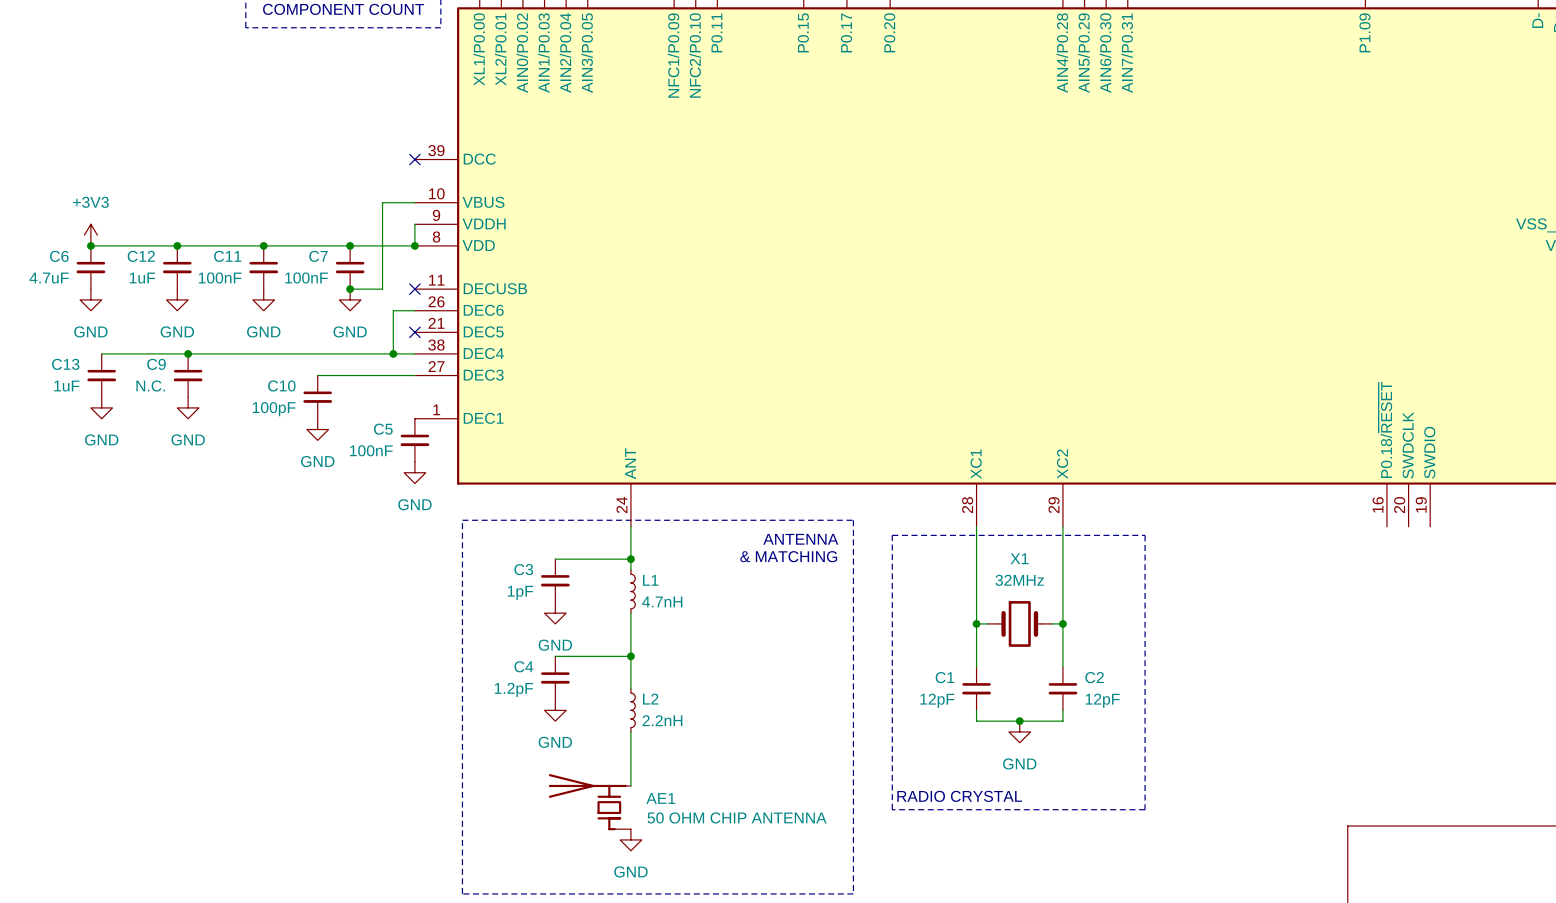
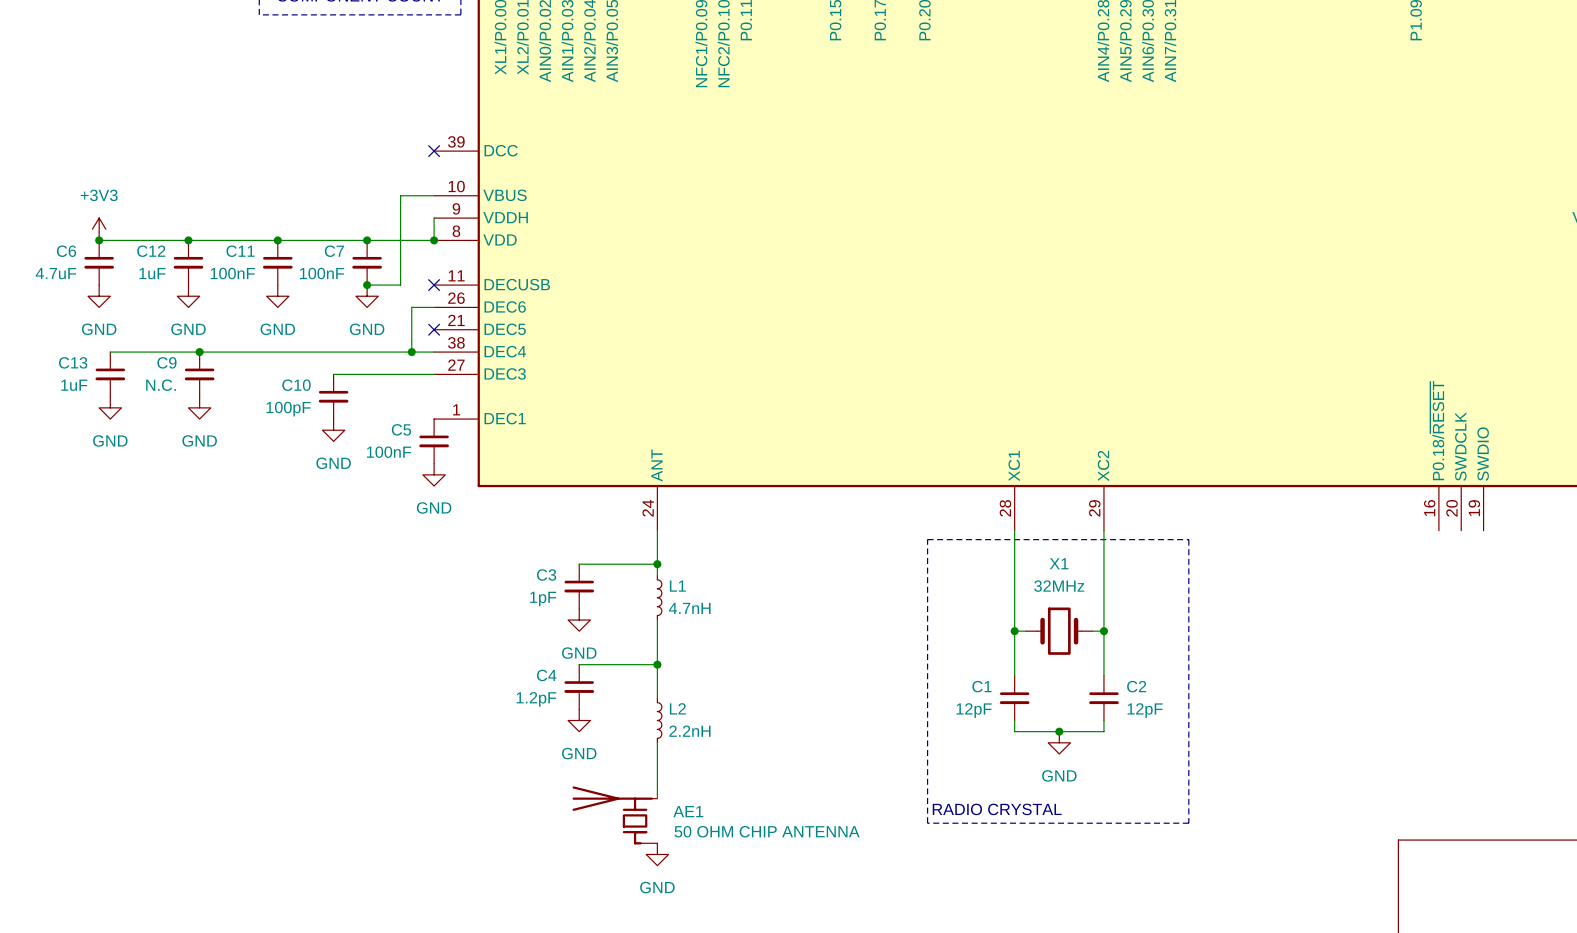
line: (462, 520) (853, 520) (853, 893) (462, 893) (462, 520) -> none
text: ANTENNA (800, 539) -> none
text: & MATCHING (788, 556) -> none

